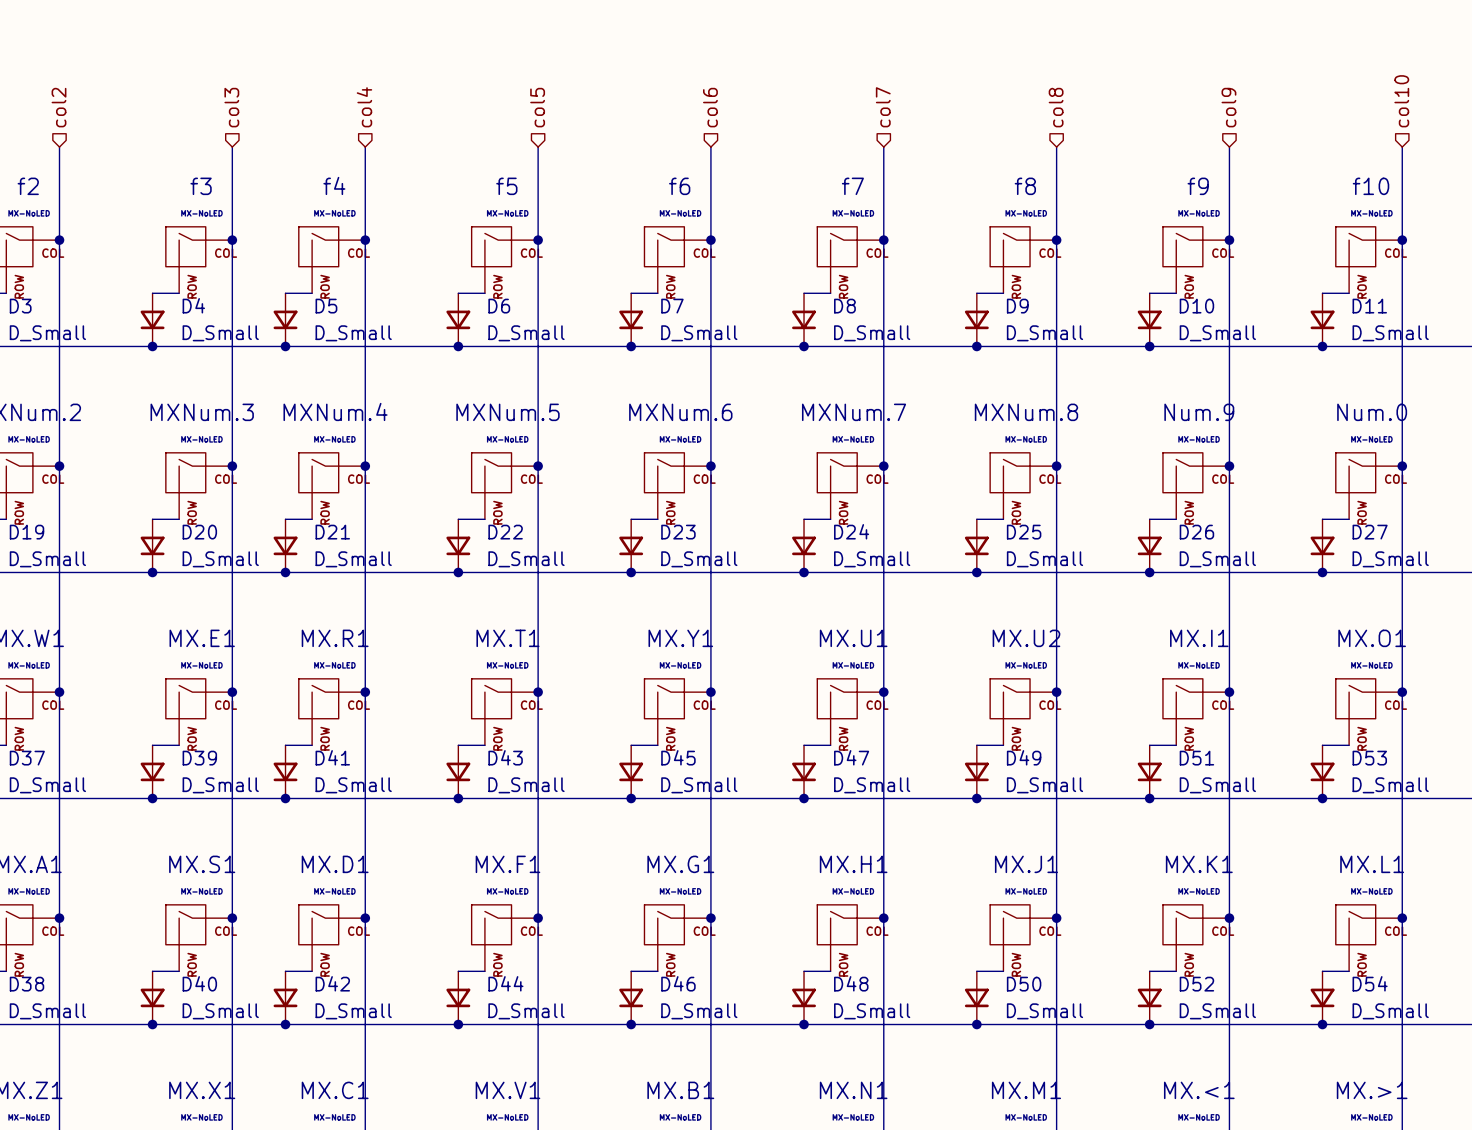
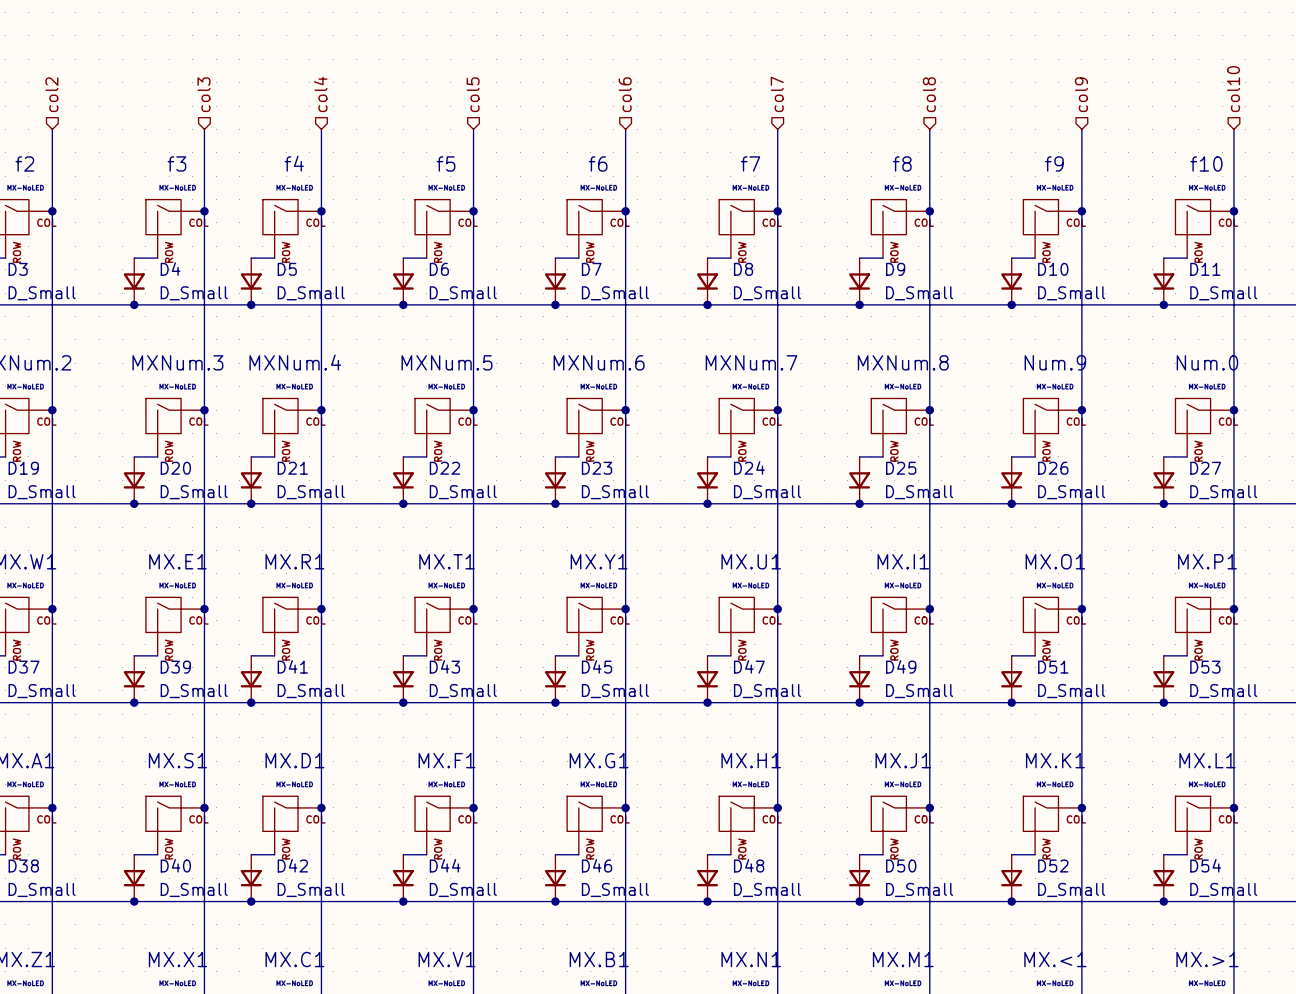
MX.U2 name: MX.U2 (1026, 638) -> MX.I1 (903, 561)
MX.I1 name: MX.I1 (1199, 638) -> MX.O1 (1055, 561)
MX.O1 name: MX.O1 (1372, 638) -> MX.P1 (1207, 561)

